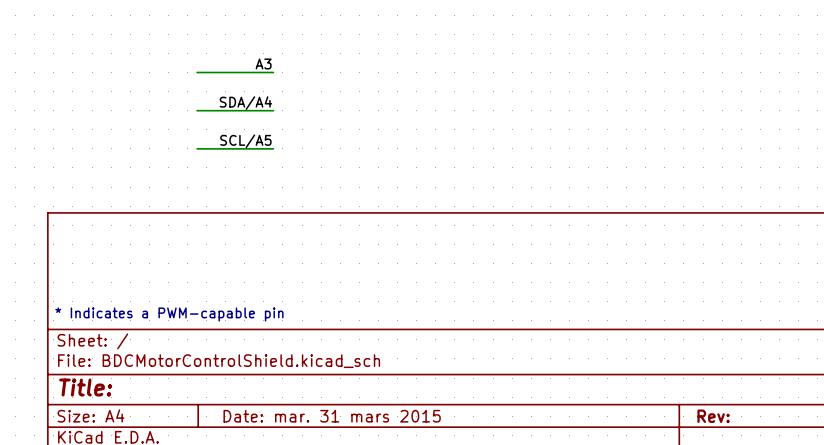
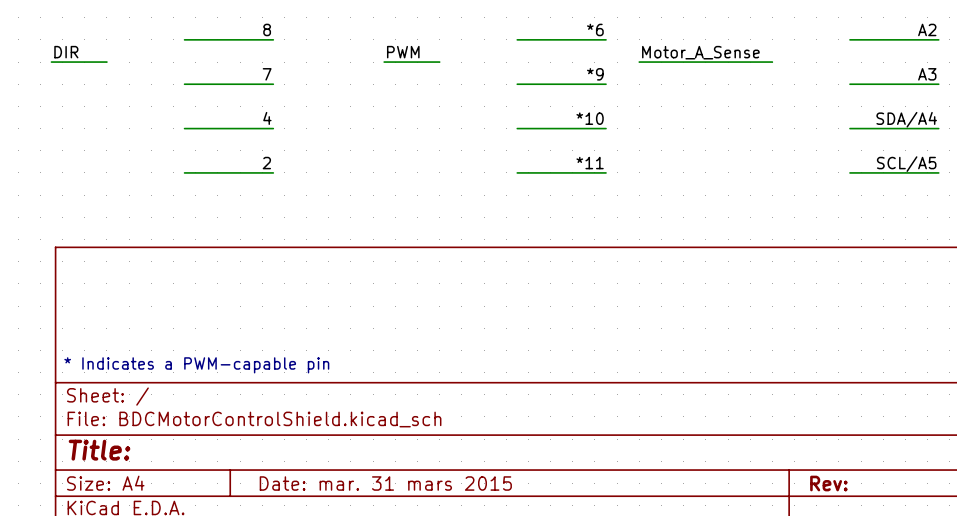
label: none -> 8 (267, 29)
label: none -> *6 (595, 29)
label: none -> A2 (927, 29)
wire: none -> (184, 39) (273, 39)
wire: none -> (517, 39) (606, 39)
wire: none -> (849, 39) (938, 39)
label: none -> DIR (66, 52)
label: none -> PWM (403, 52)
label: none -> Motor_A_Sense (700, 52)
wire: none -> (51, 62) (106, 62)
wire: none -> (384, 62) (439, 62)
wire: none -> (639, 62) (772, 62)
label: none -> 7 (267, 74)
label: A3 (263, 63) -> none
label: none -> *9 (595, 74)
label: none -> A3 (927, 74)
wire: (235, 72) (273, 72) -> (184, 84) (228, 84)
wire: none -> (517, 84) (606, 84)
wire: none -> (849, 84) (938, 84)
label: none -> 4 (267, 118)
label: none -> *10 (590, 118)
label: SDA/A4 (245, 103) -> none
label: none -> SDA/A4 (906, 119)
wire: (235, 110) (273, 110) -> (184, 128) (228, 128)
wire: none -> (517, 128) (606, 128)
wire: none -> (849, 128) (938, 128)
label: none -> 2 (266, 163)
label: none -> *11 (590, 163)
label: SCL/A5 (245, 141) -> none
label: none -> SCL/A5 (906, 164)
wire: (235, 148) (273, 148) -> (184, 172) (228, 172)
wire: none -> (517, 172) (606, 172)
wire: none -> (849, 172) (938, 172)

